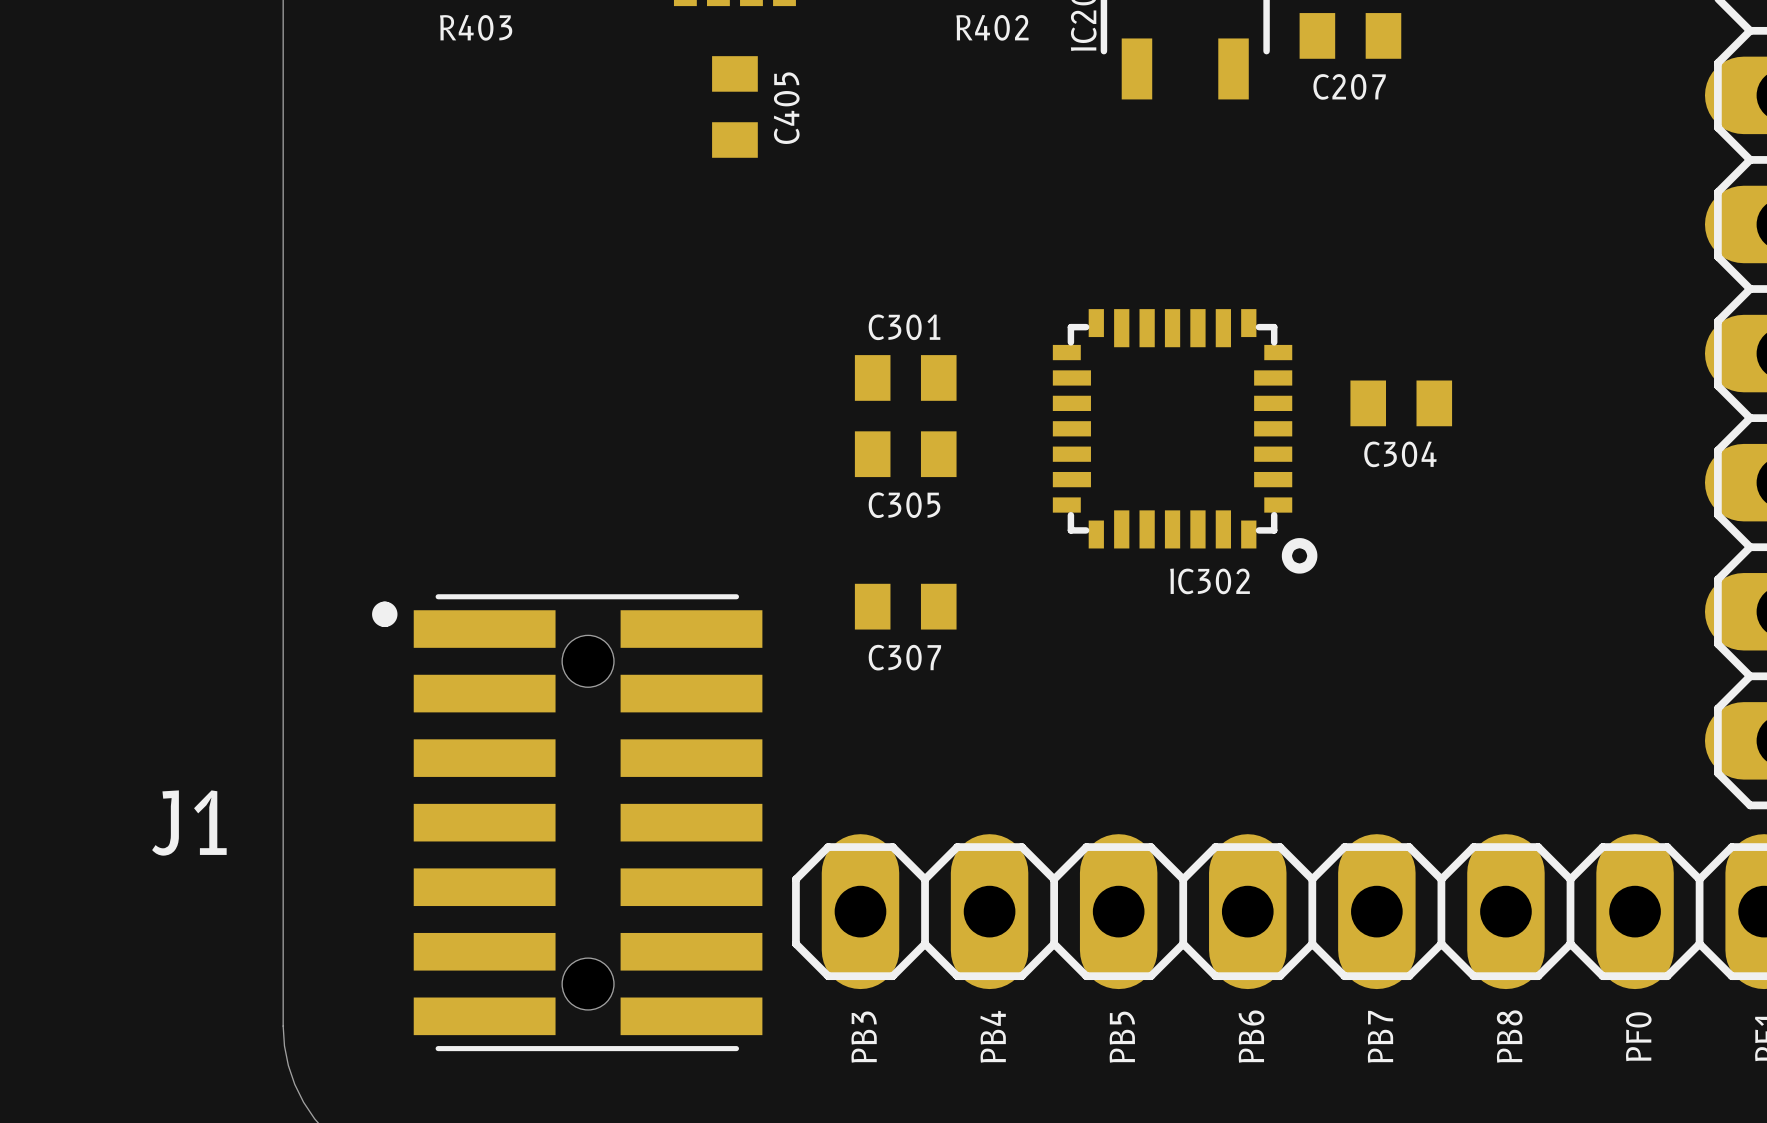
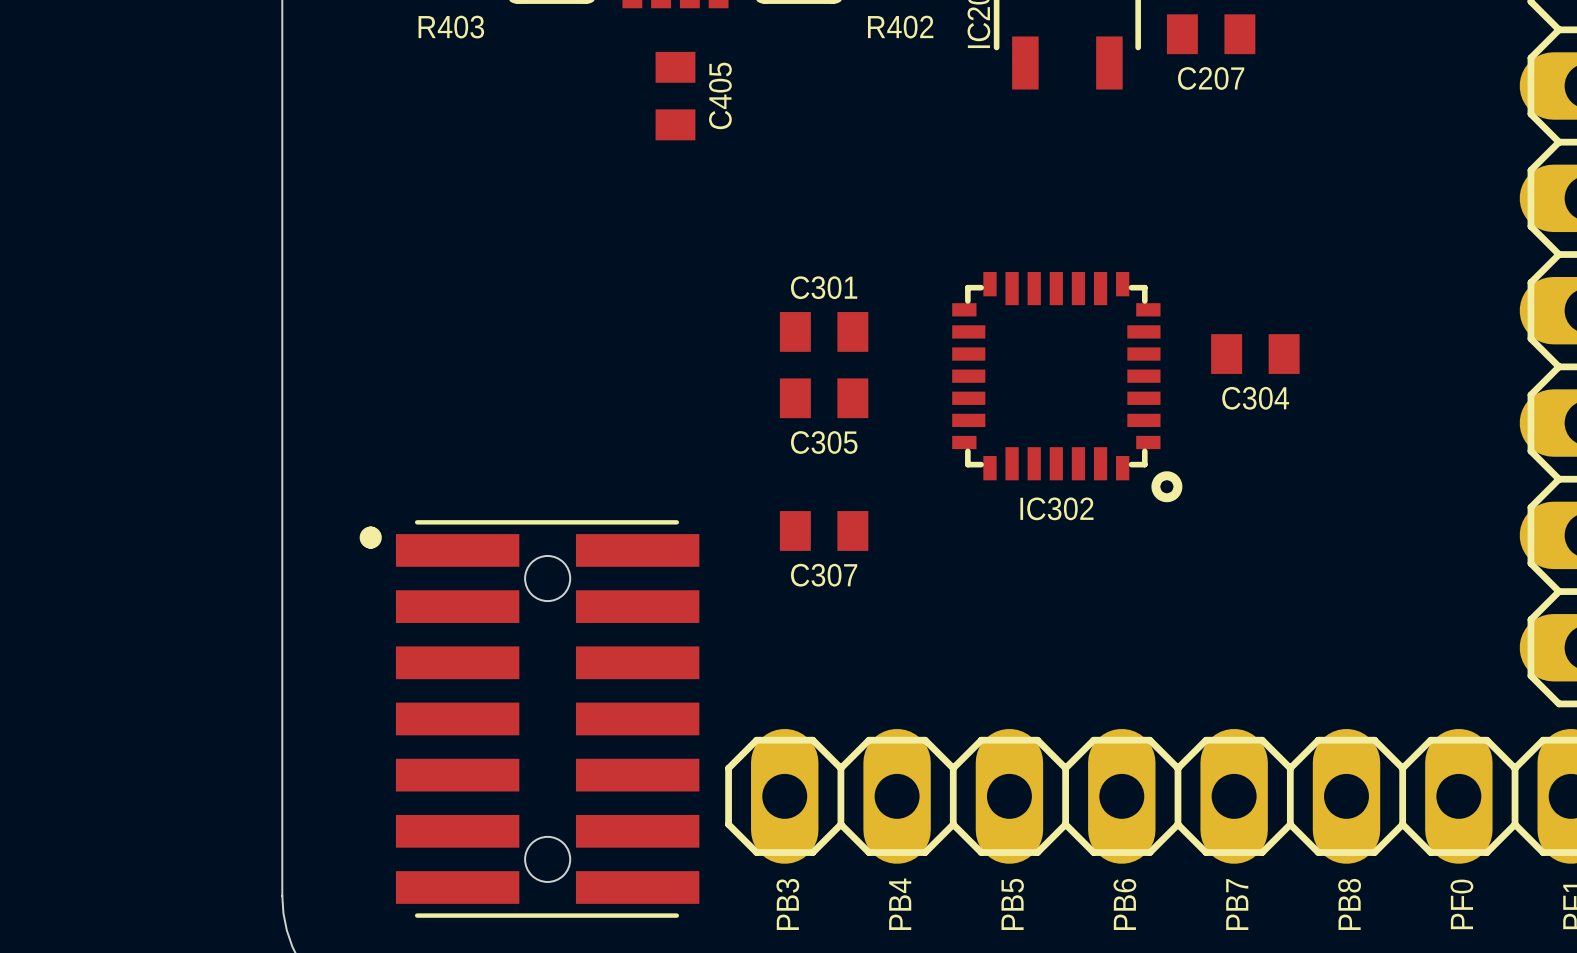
IC302 name position: IC302 (1210, 581) -> IC302 (1056, 508)
J1 name: J1 (189, 823) -> none

